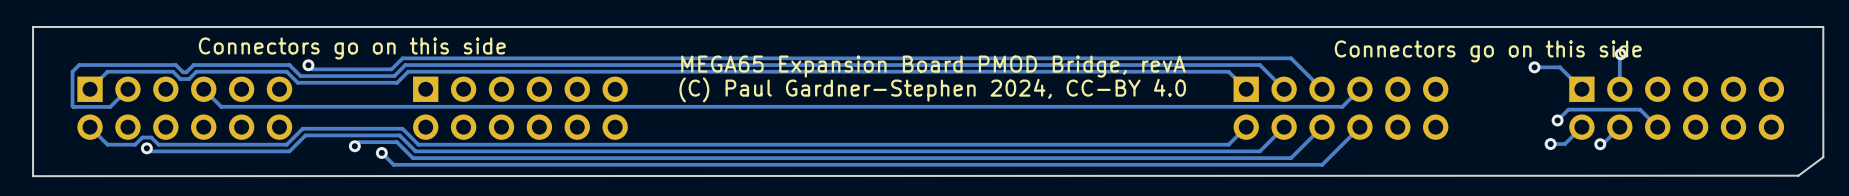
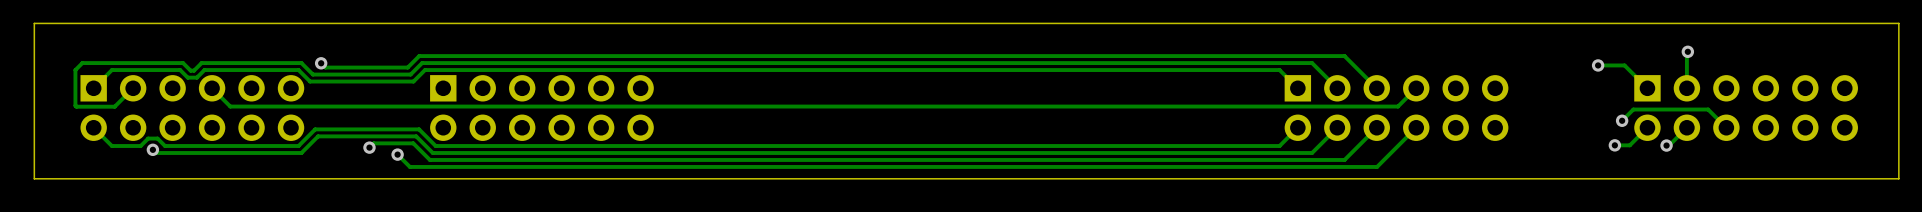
board edge: (1823, 26) (1823, 157) (1798, 175) (33, 176) -> (1898, 23) (1898, 178) (34, 178)
text: Connectors go on this side (352, 48) -> none
text: Connectors go on this side (1488, 51) -> none
text: MEGA65 Expansion Board PMOD Bridge, revA (933, 66) -> none
text: (C) Paul Gardner-Stephen 2024, CC-BY 4.0 (932, 89) -> none

